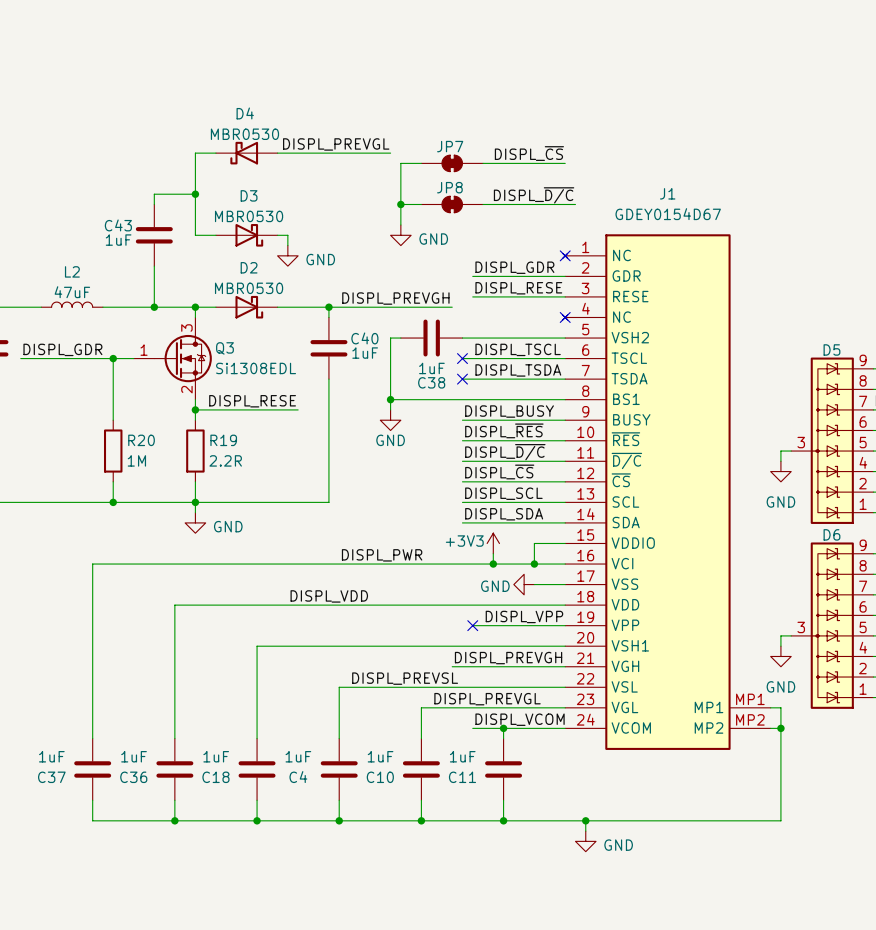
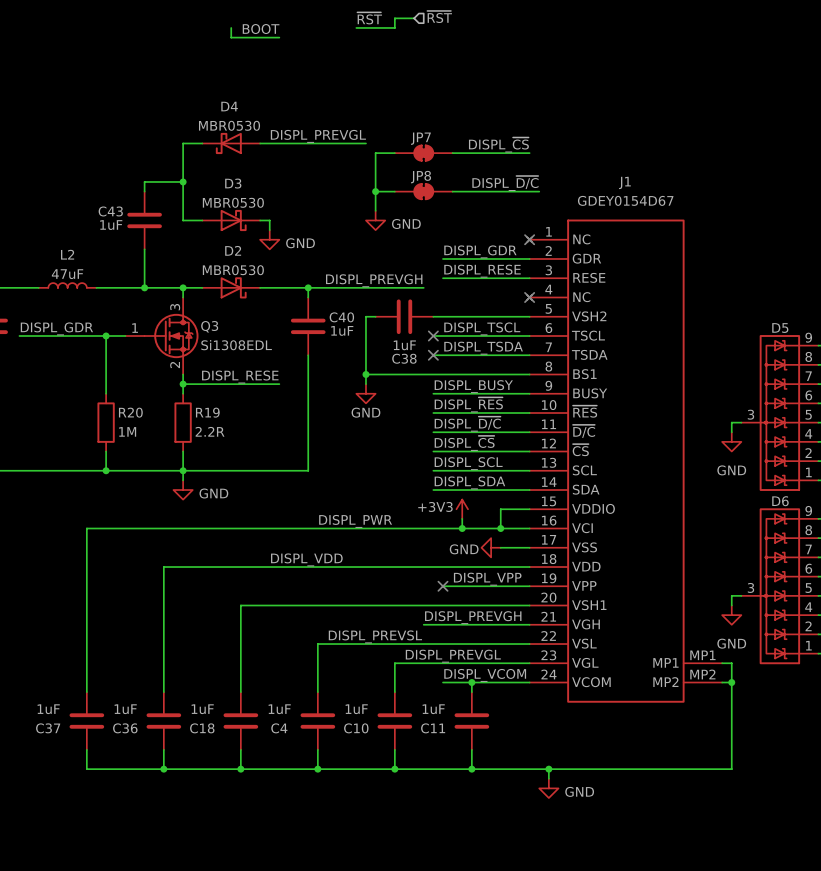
sheet pin: none -> ~{RST} (439, 16)
label: none -> ~{RST} (369, 18)
wire: none -> (414, 18) (394, 18) (394, 27) (356, 27)
wire: none -> (231, 27) (231, 37) (279, 37)
label: none -> BOOT (261, 29)

